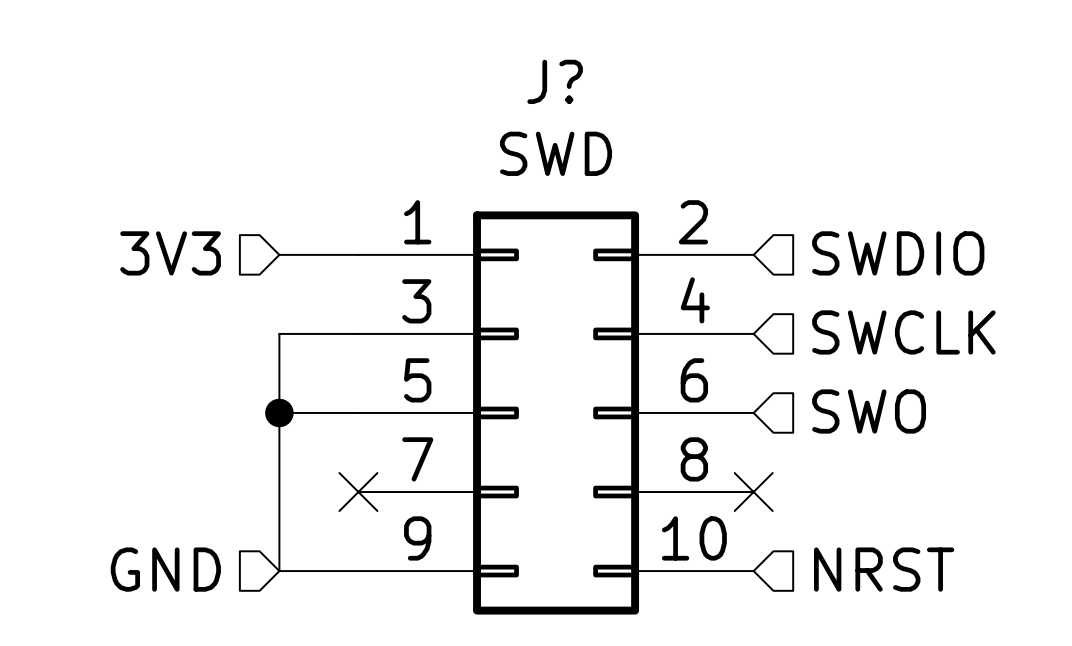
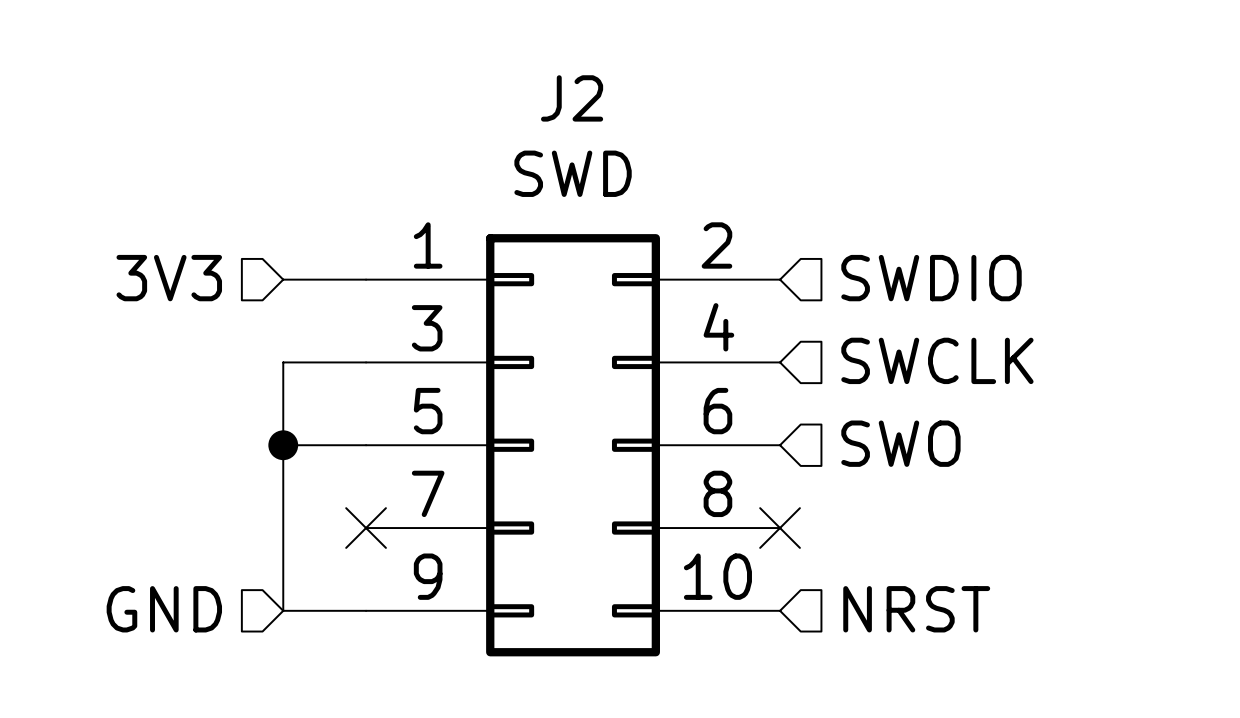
J? name: J? (555, 81) -> J2 (572, 98)

